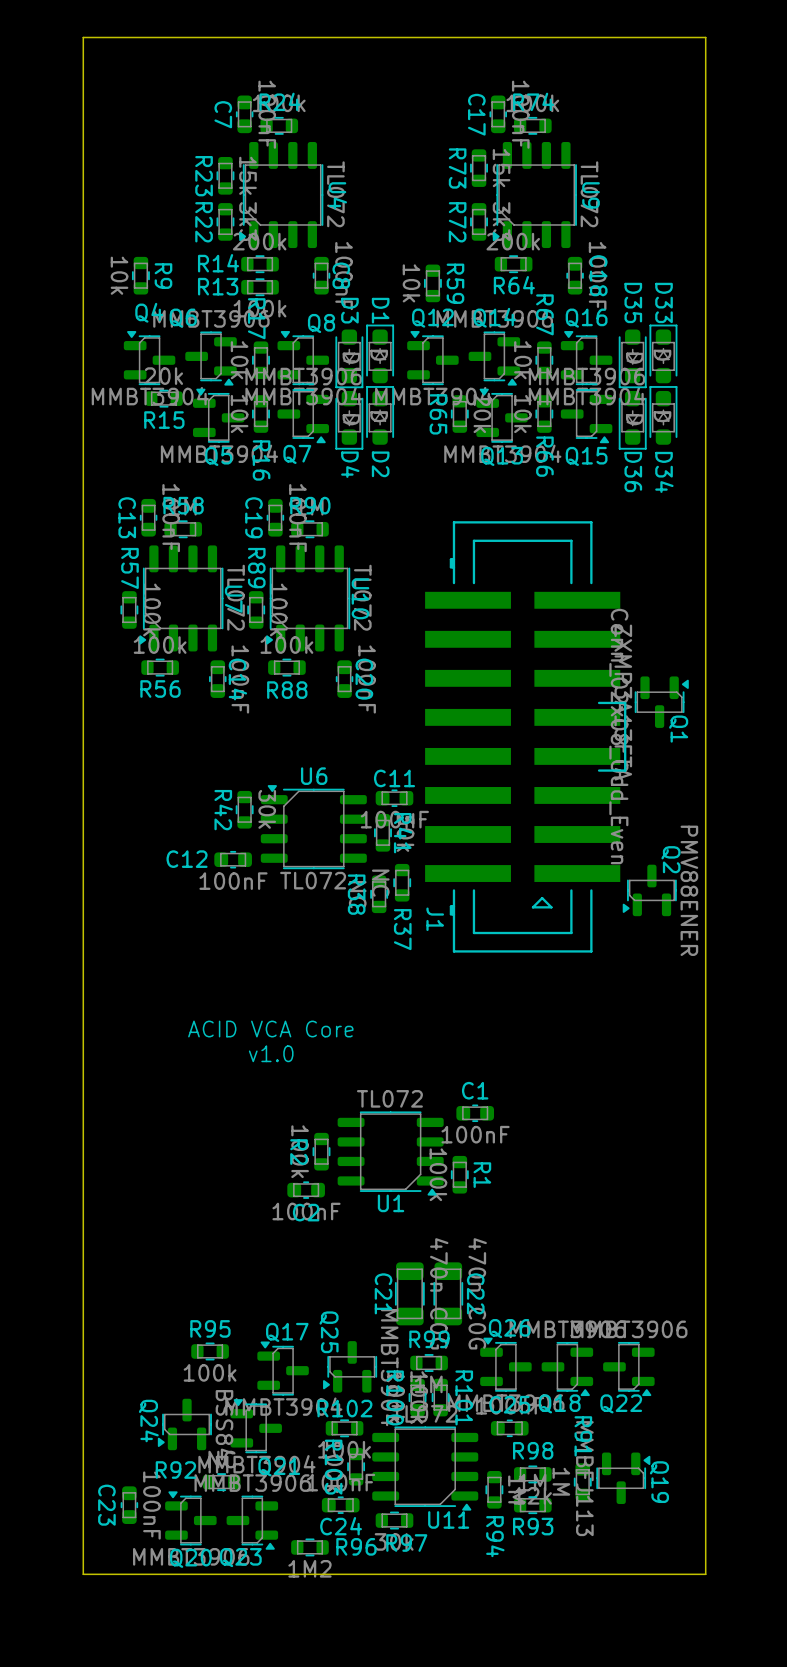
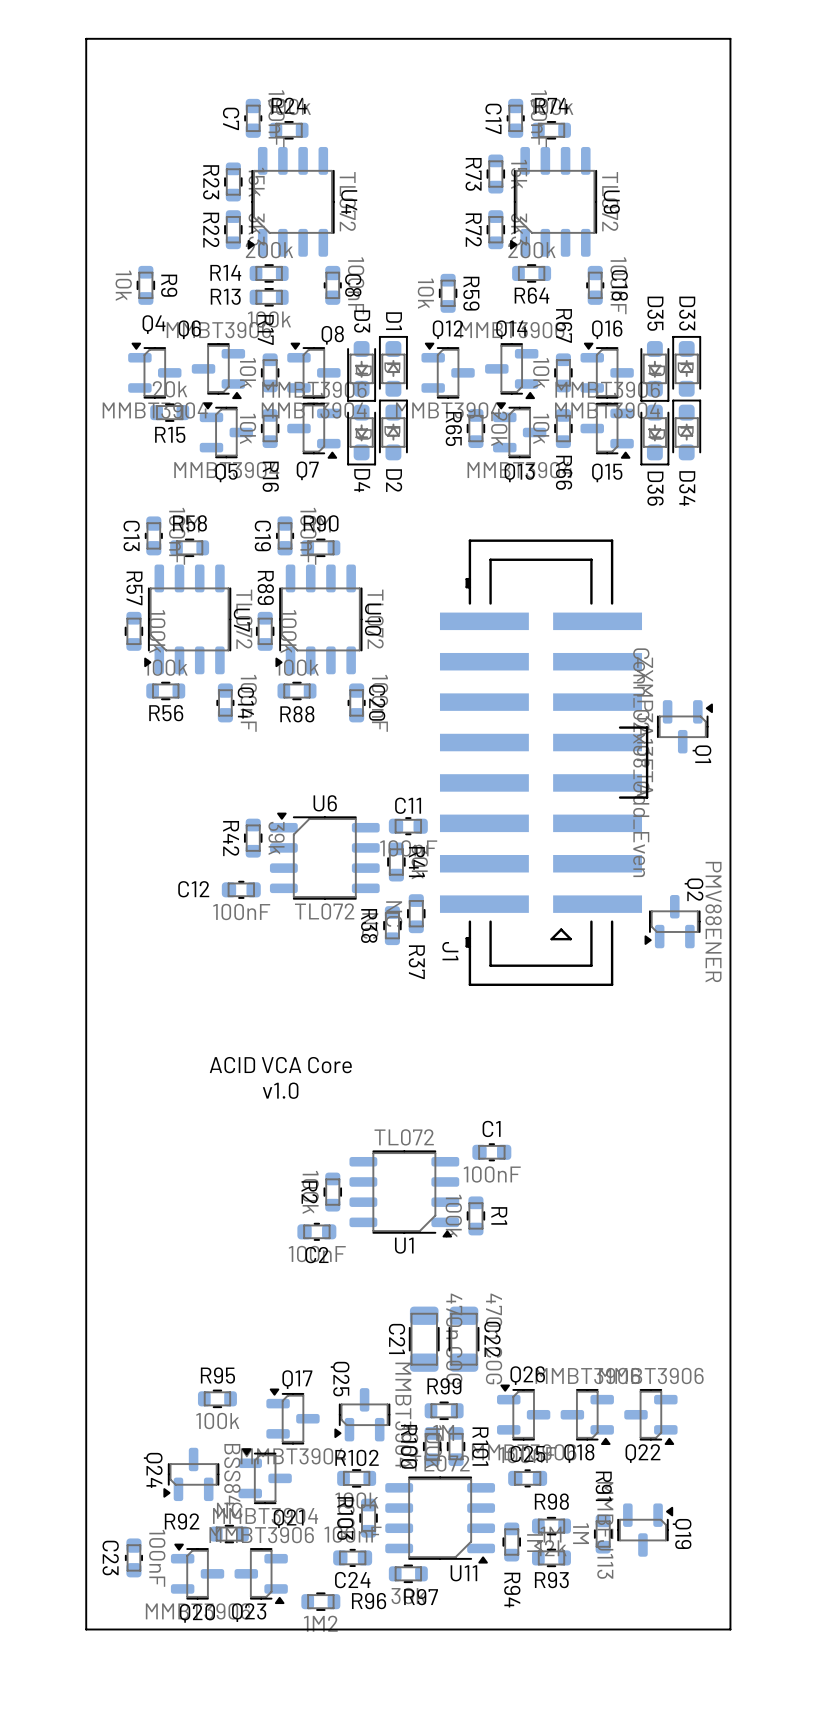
R42 value: 30k (267, 809) -> 39k (276, 838)

